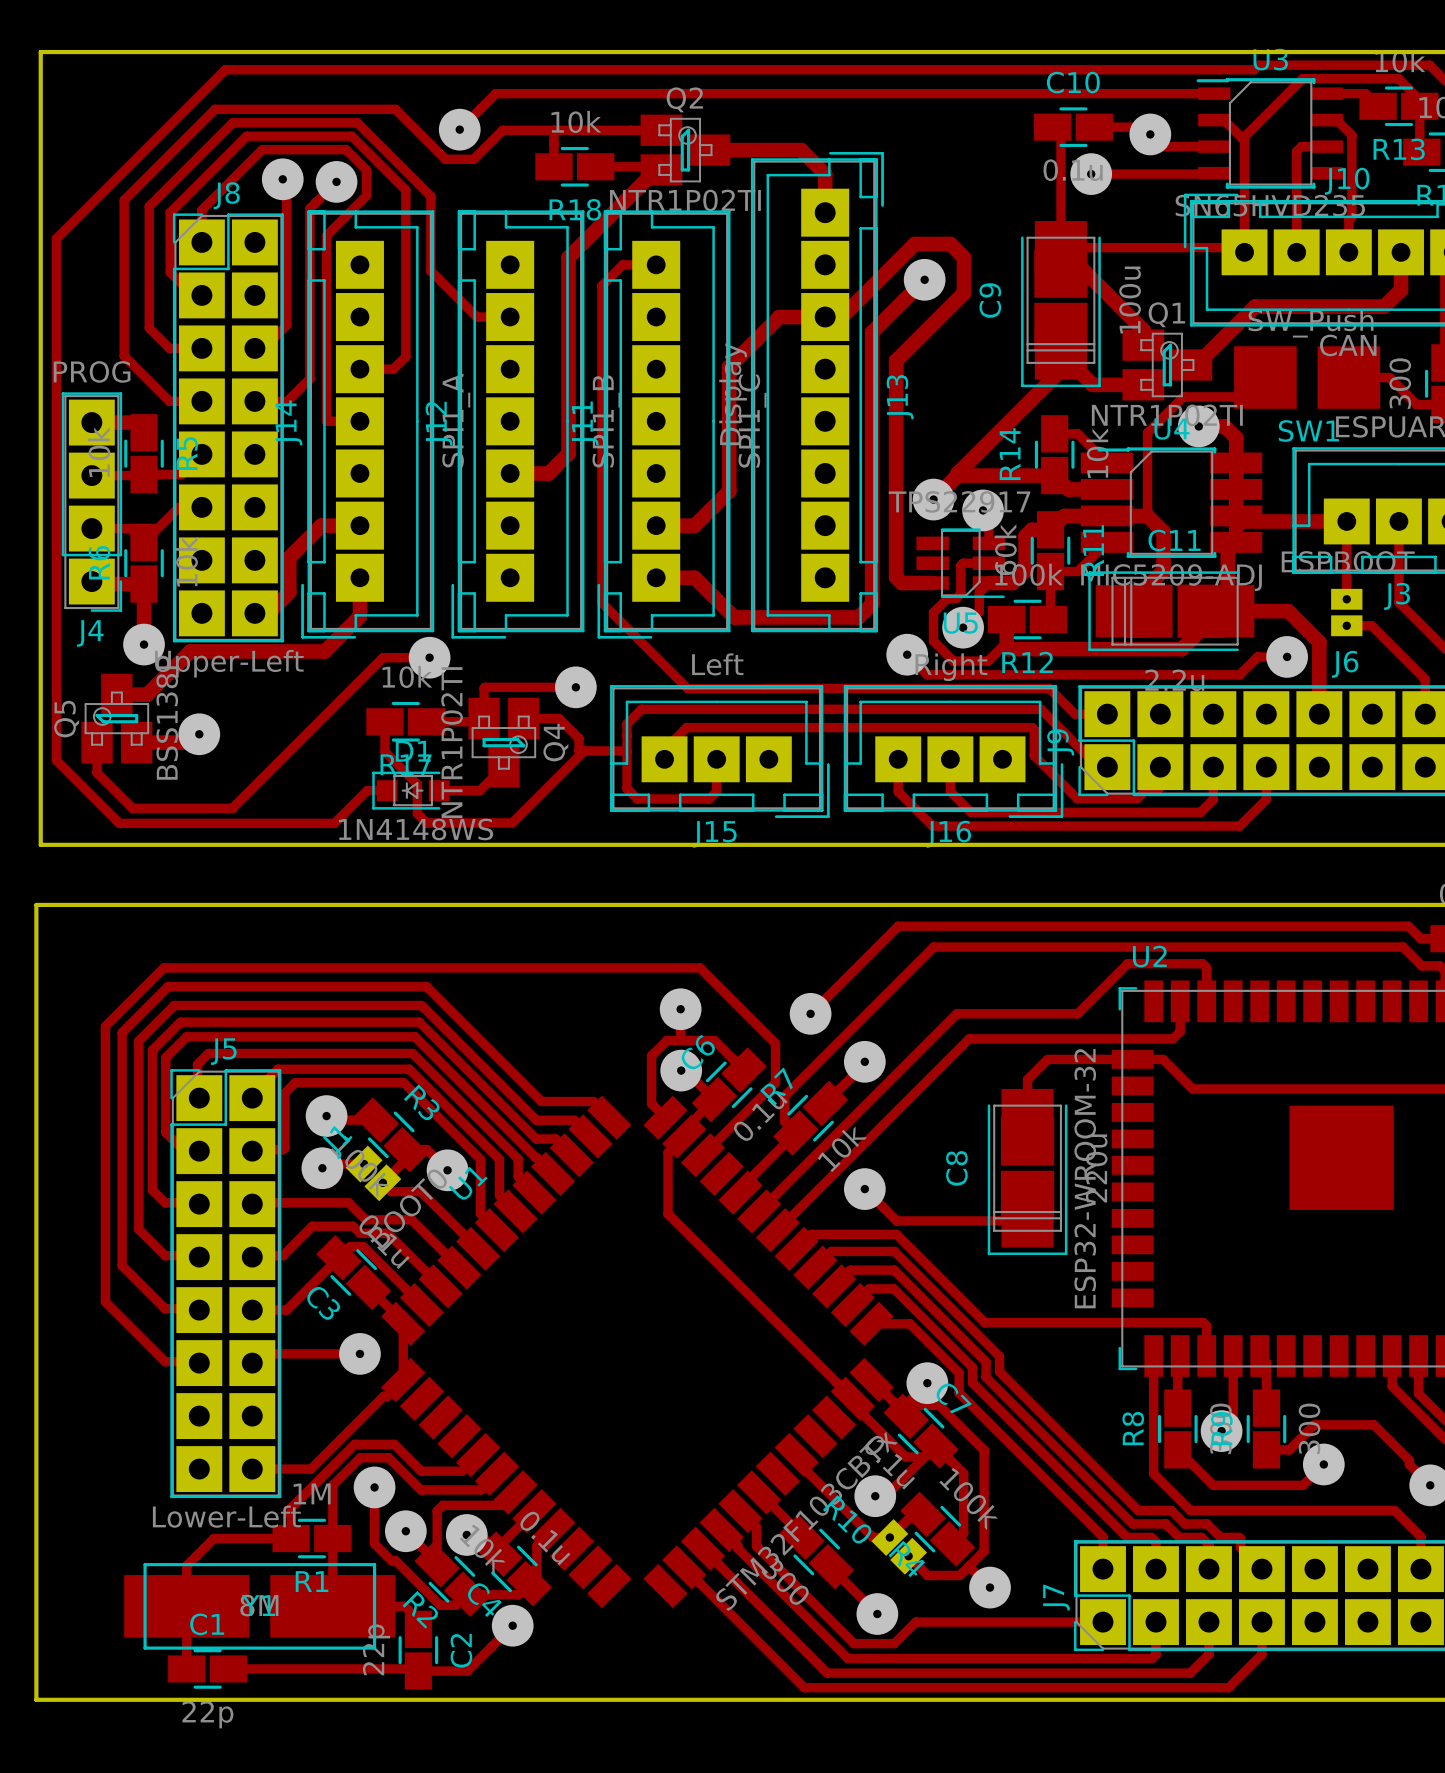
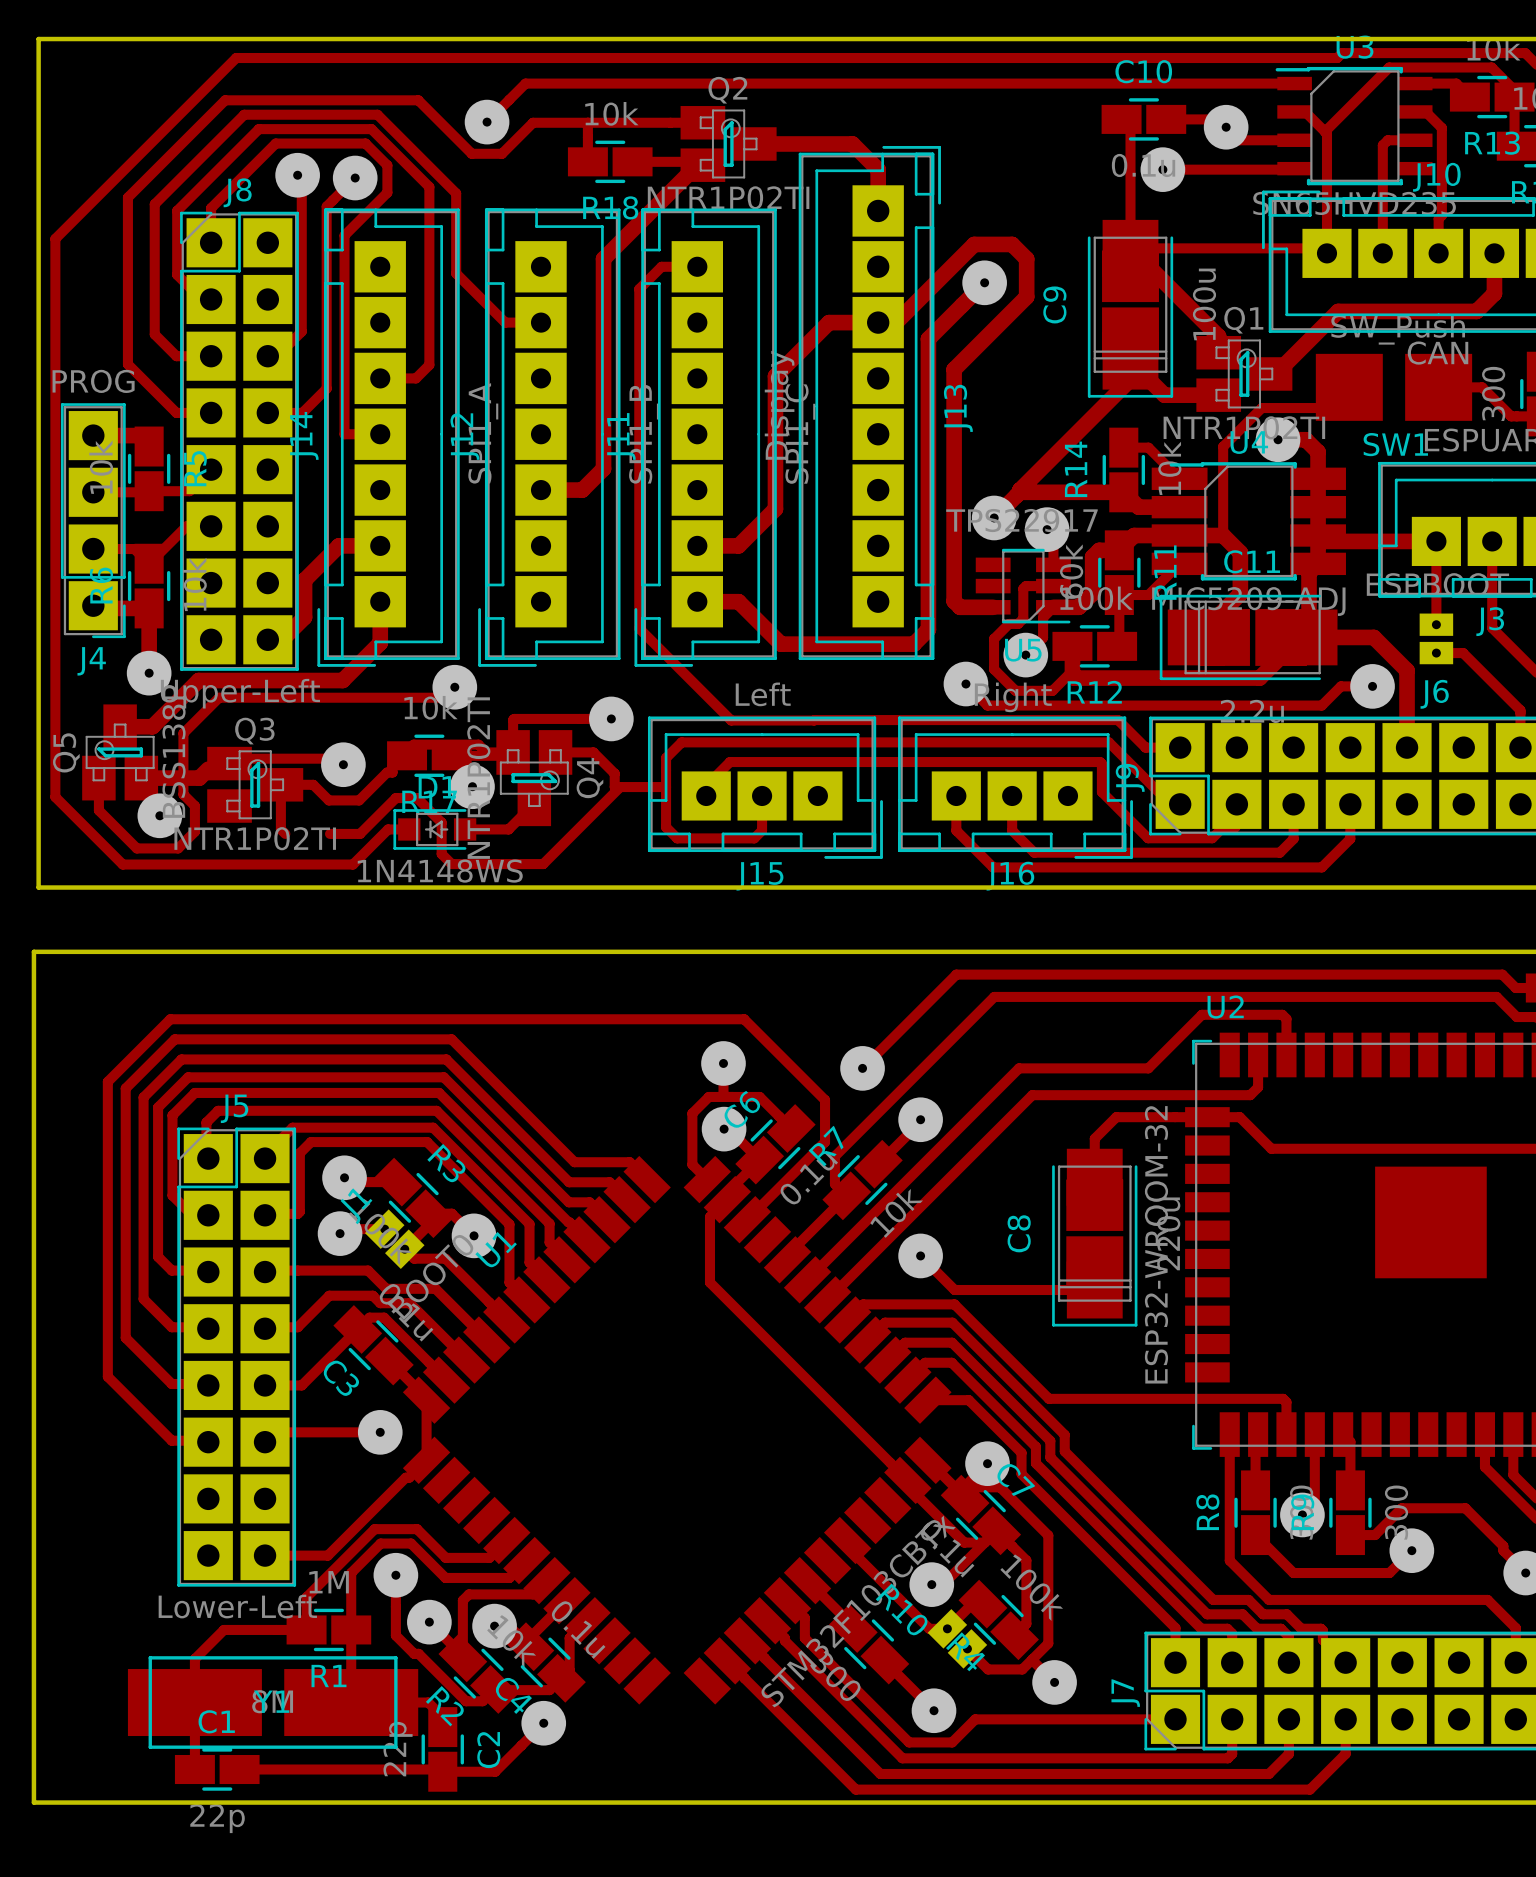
track: (429, 657) (383, 657) (232, 808) (171, 808) -> (460, 697) (219, 697) (183, 733) (183, 794) (194, 806) (194, 831) (178, 848)
track: none -> (513, 752) (486, 752) (478, 744) (413, 744) (392, 765) (392, 772) (387, 772) (359, 800) (328, 800) (313, 784) (280, 784) (280, 829) (285, 833)
track: (384, 721) (384, 751) (394, 761) -> (330, 833) (360, 833) (395, 798) (417, 798)
track: none -> (229, 763) (234, 758) (337, 758) (343, 764)
via: none -> (343, 764)
via position: (199, 734) -> (159, 815)
Q3: none -> NTR1P02TI (255, 784)
via: none -> (472, 786)

